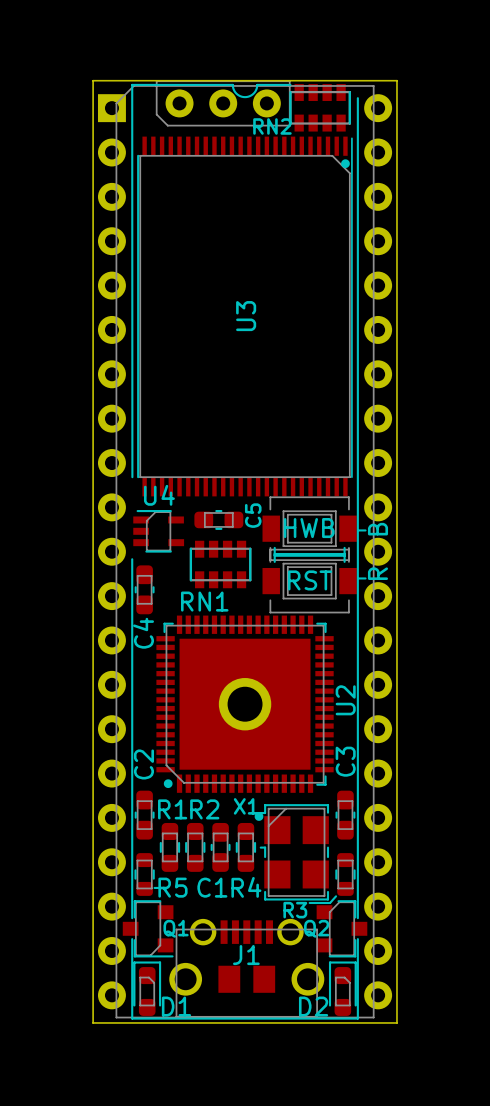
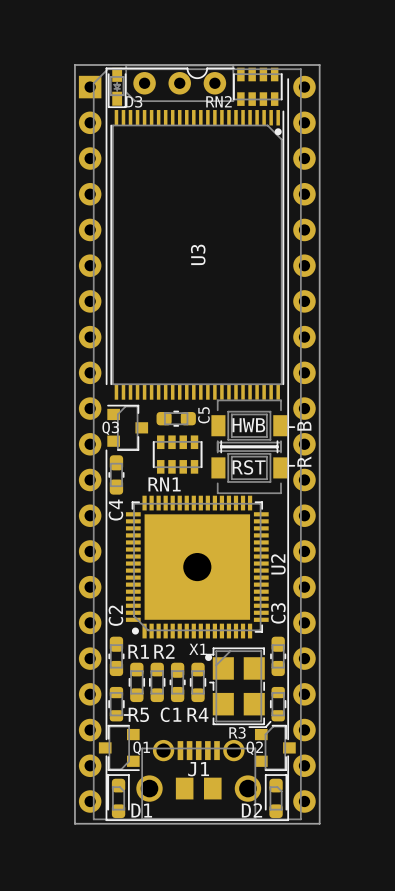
D3: none -> (117, 87)
U4: (158, 531) -> none
Q3: none -> (127, 427)

